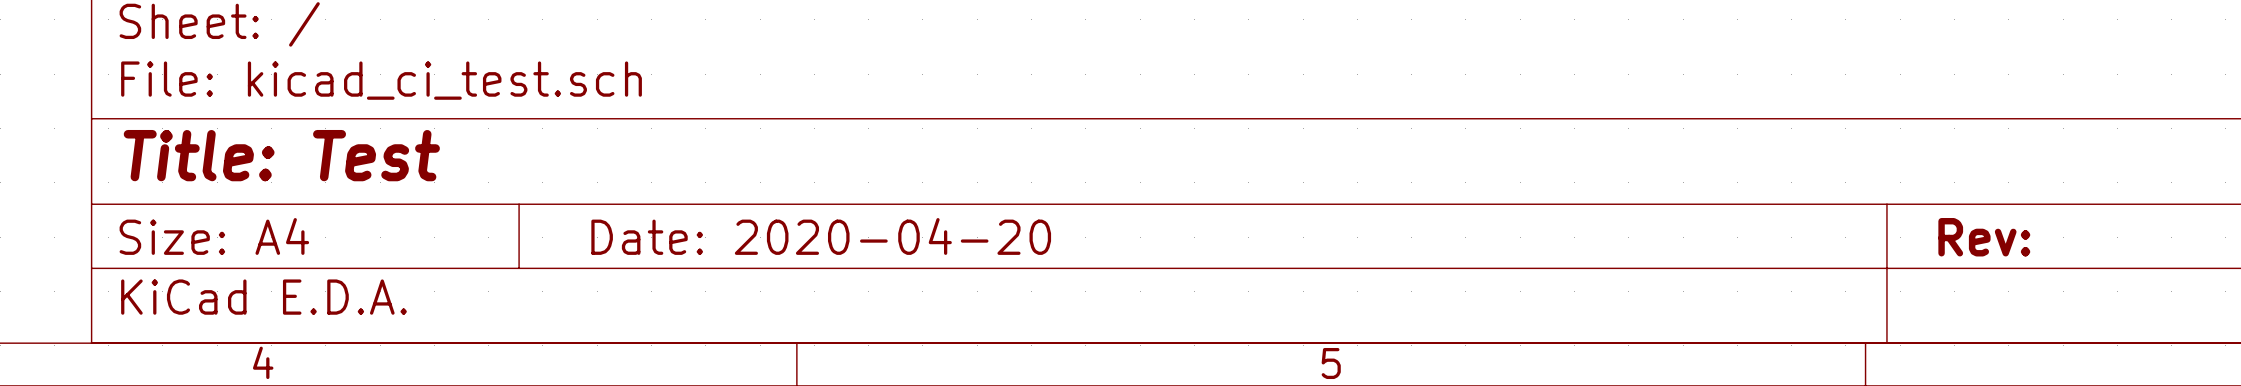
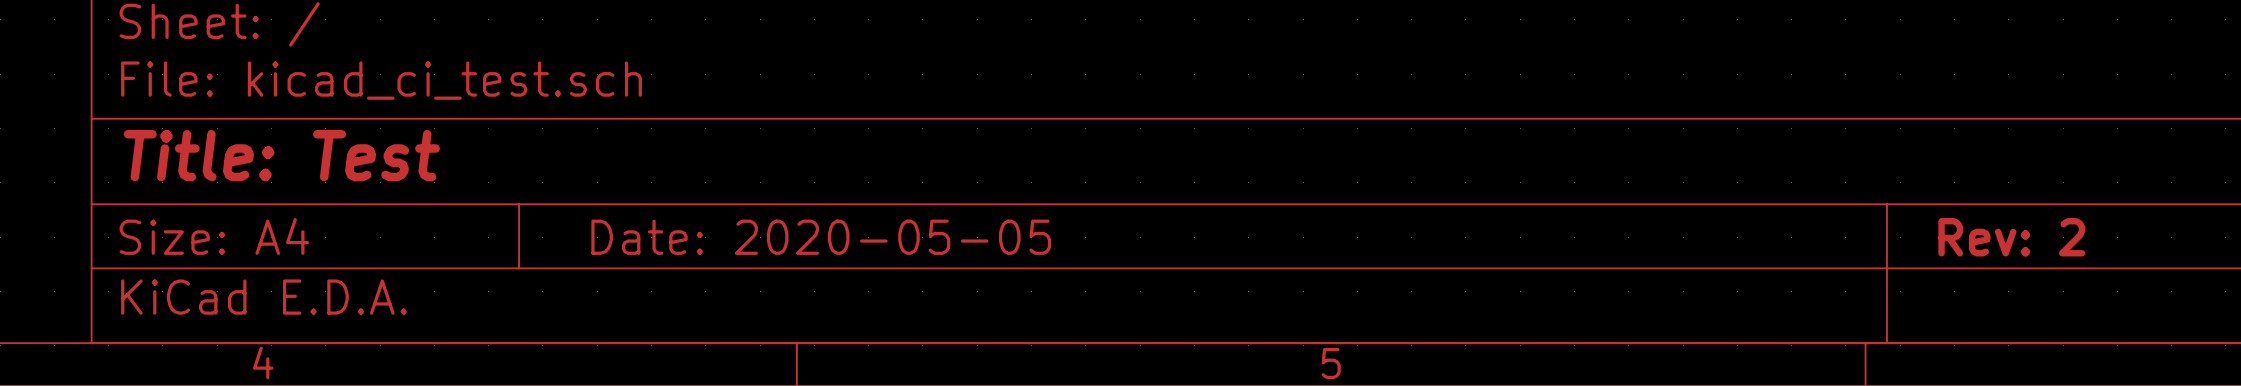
title block: Date: 2020-04-20 (821, 236) -> Date: 2020-05-05 (821, 237)
title block: Rev: (1984, 237) -> Rev: 2 (2011, 237)

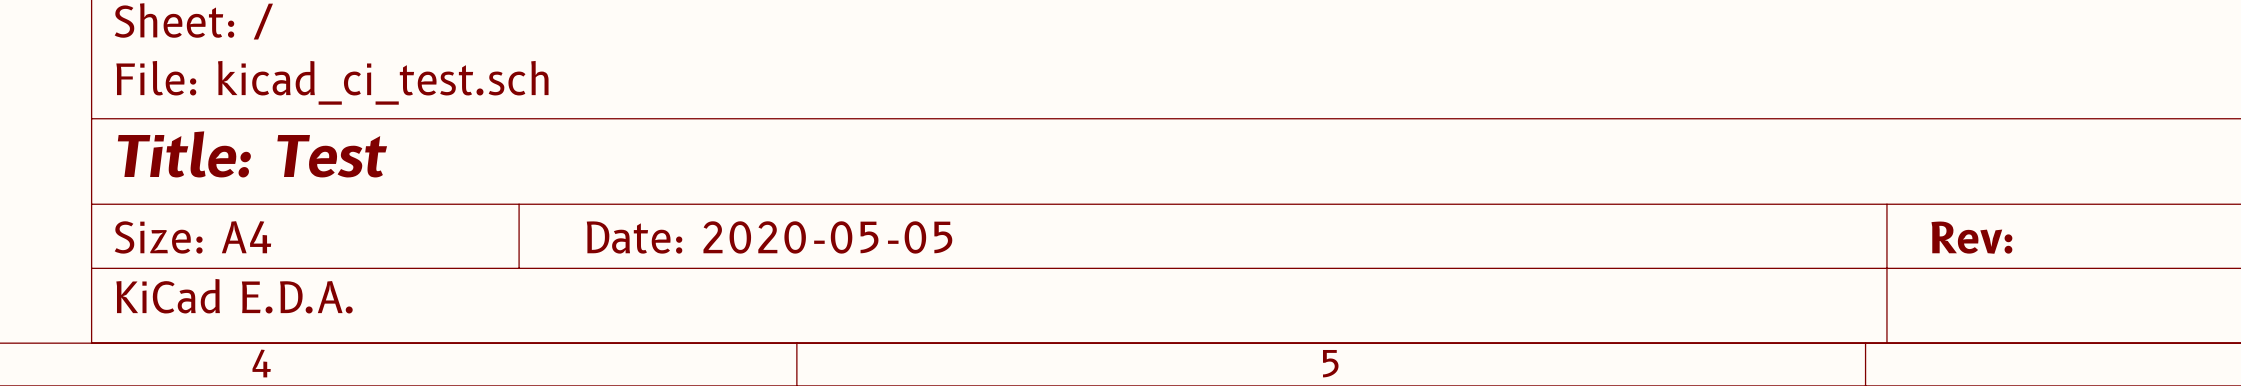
title block: Rev: 2 (2011, 237) -> Rev: (1971, 237)

